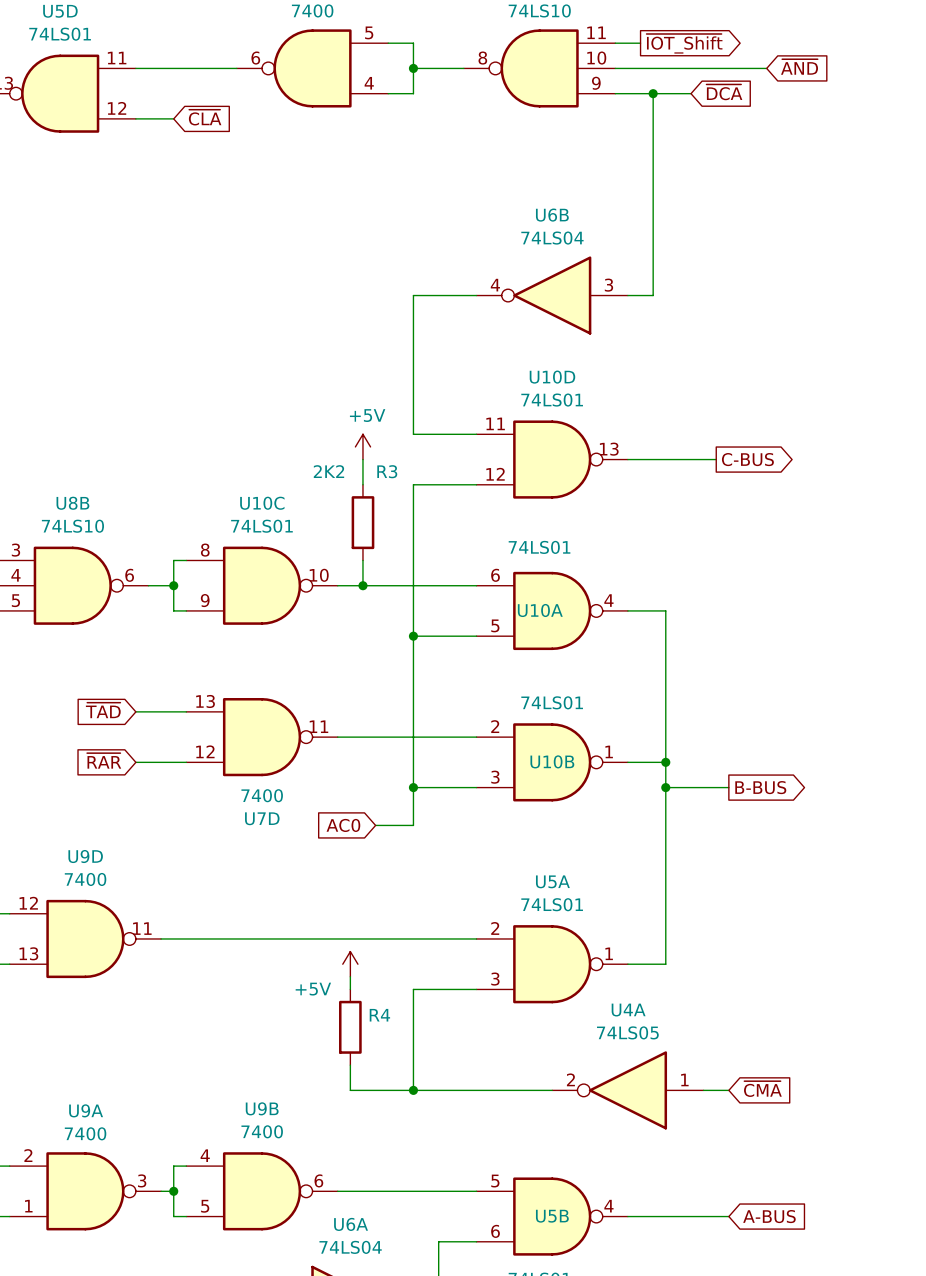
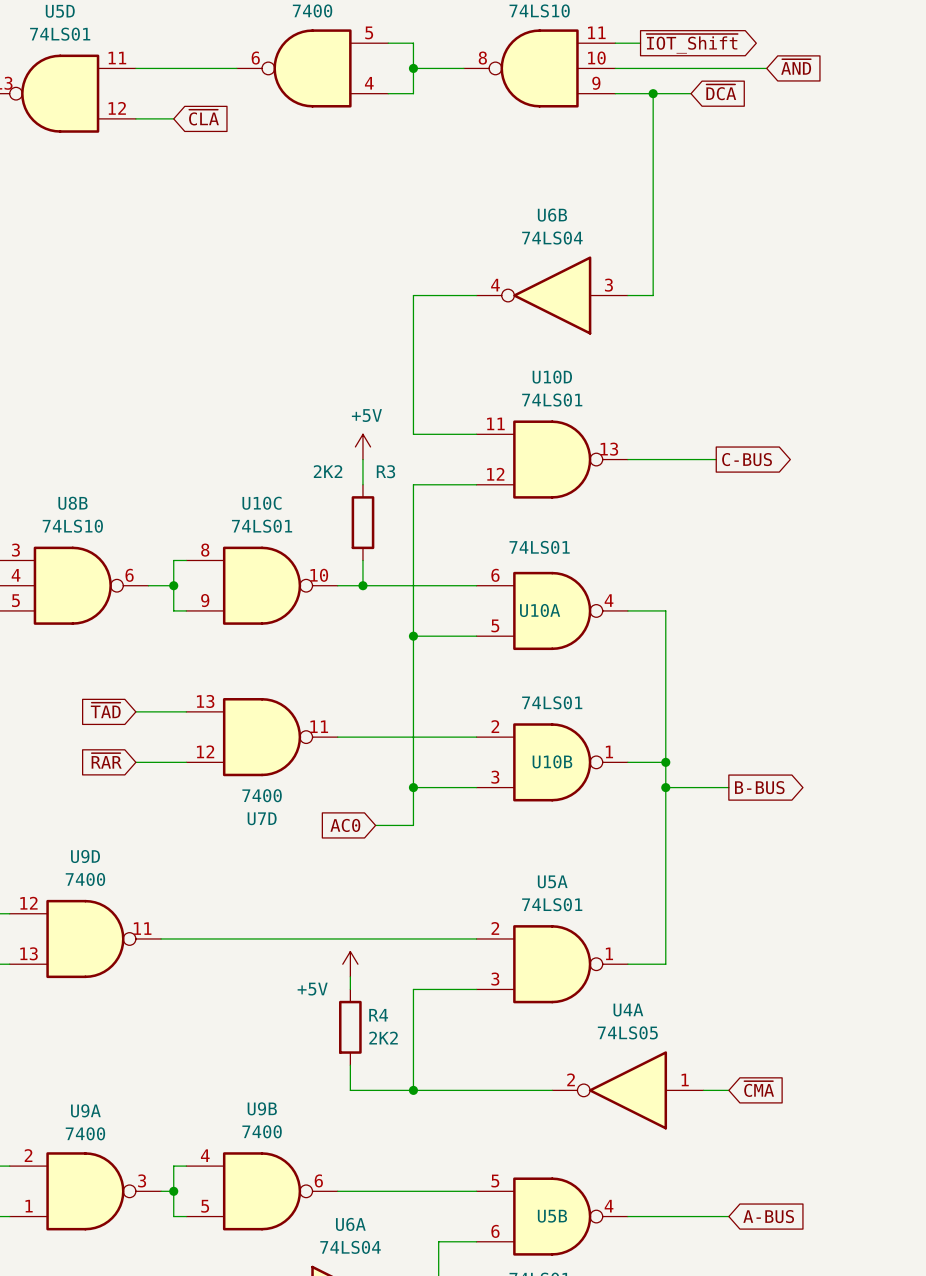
R4 value: none -> 2K2 (383, 1038)

